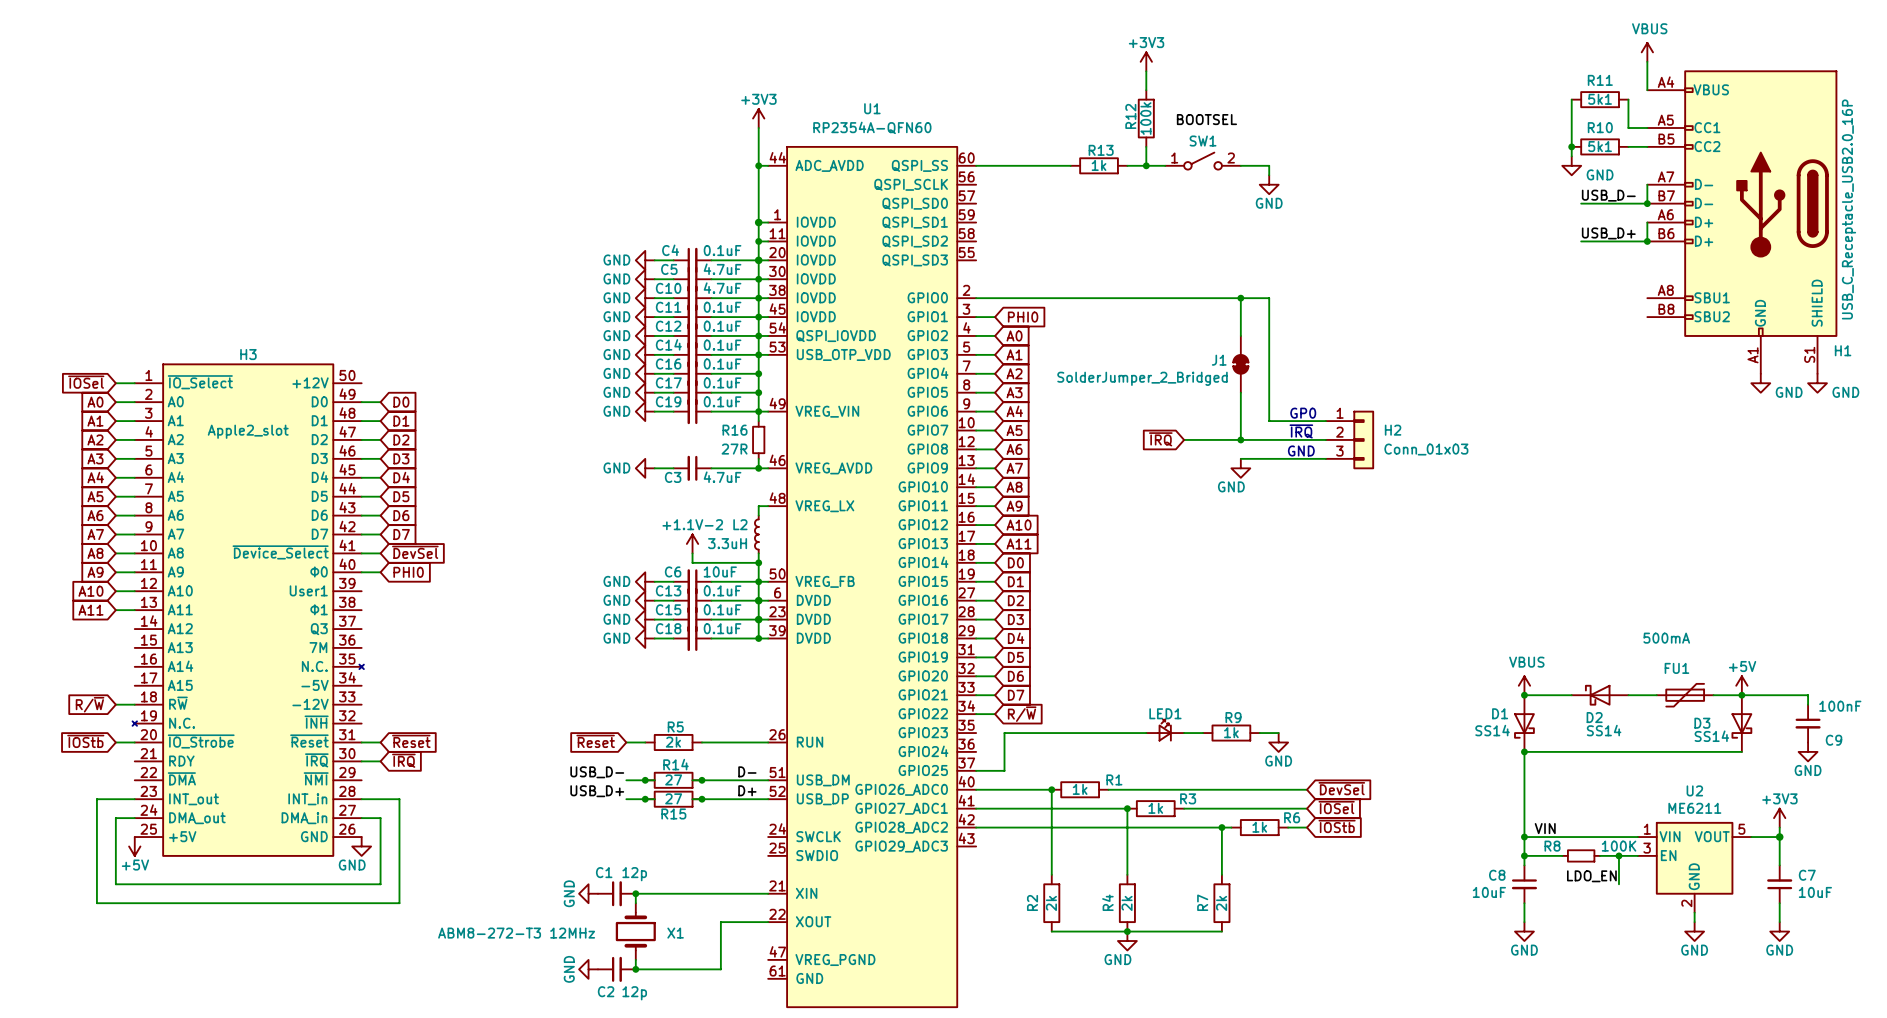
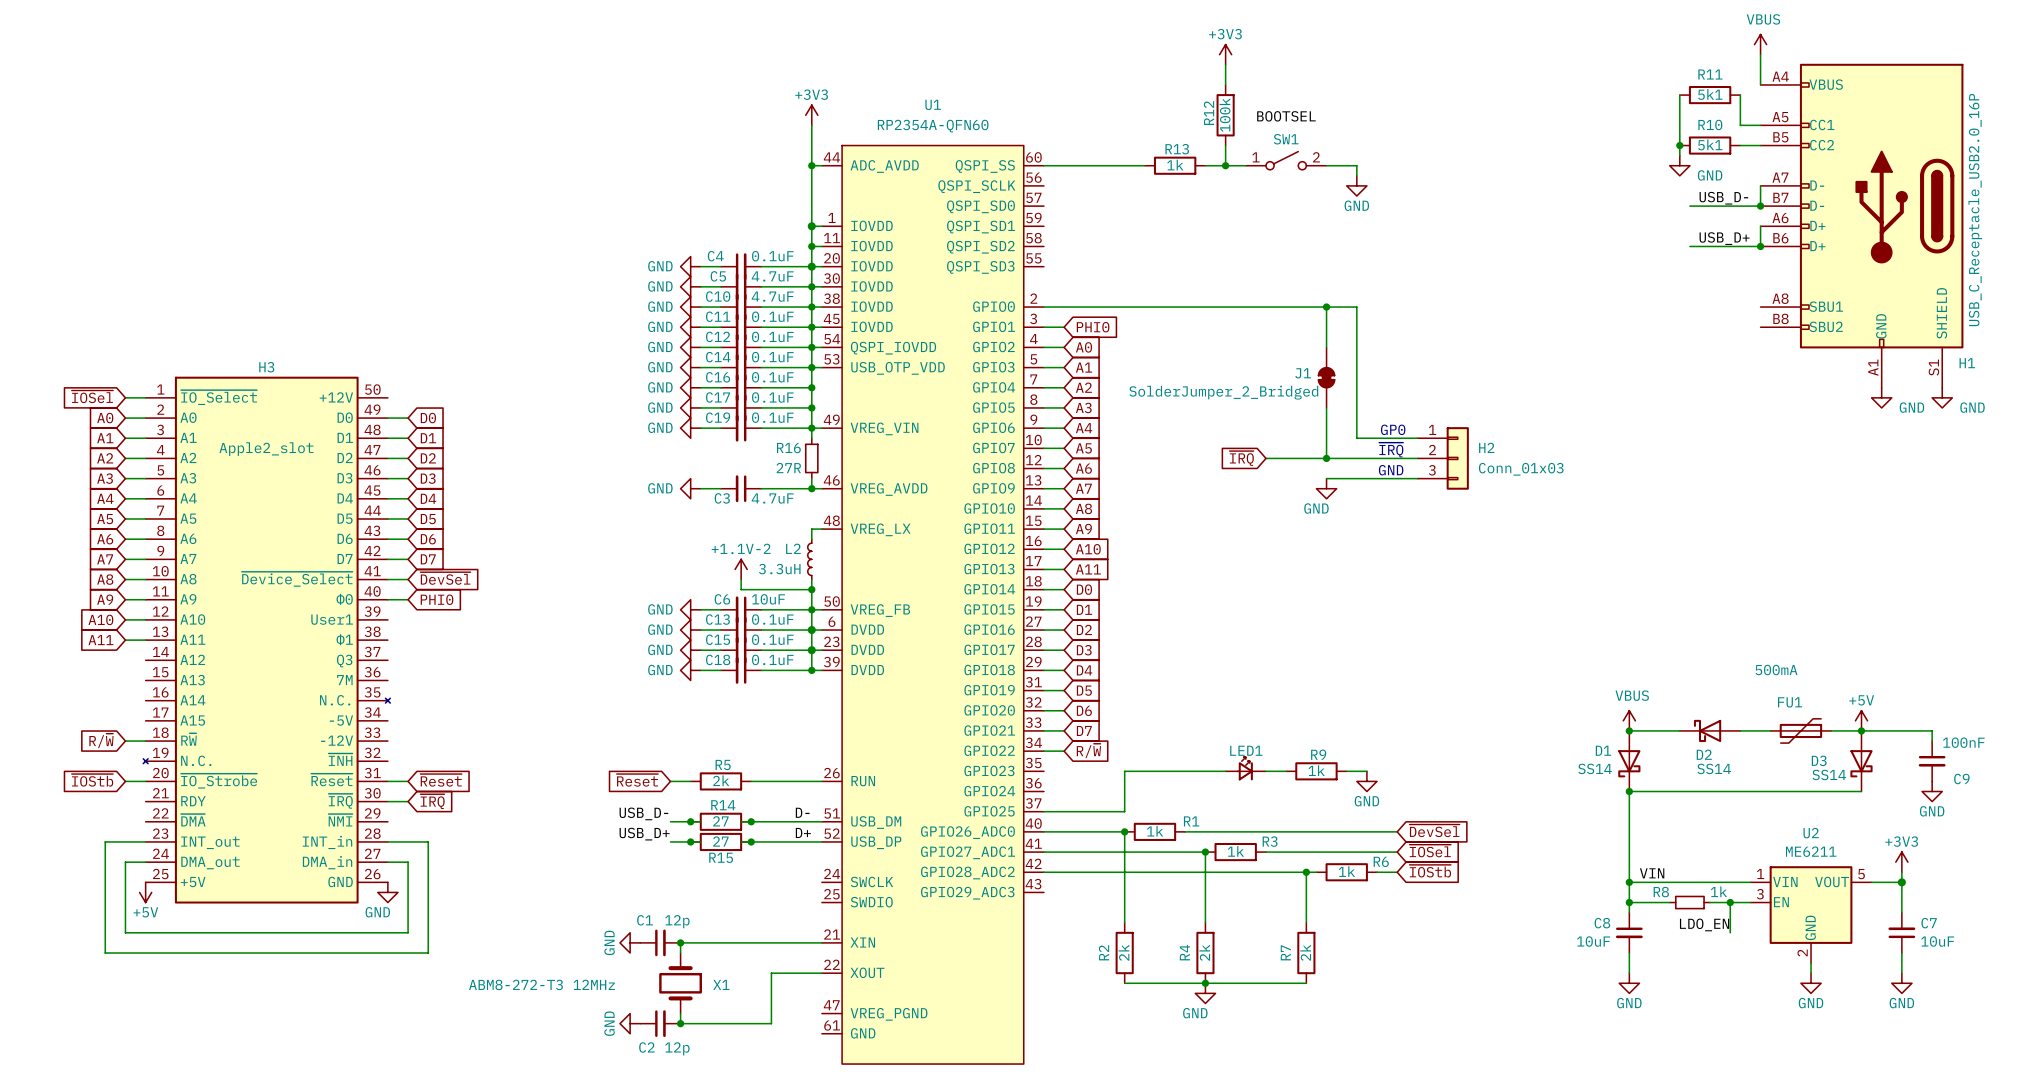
wire: (1051, 733) (1004, 733) (1004, 770) -> (1124, 771) (1124, 811) (1074, 811)
R8 value: 100K (1619, 846) -> 1k (1718, 891)

